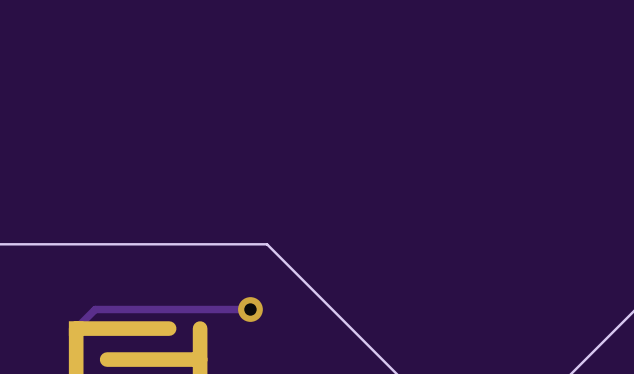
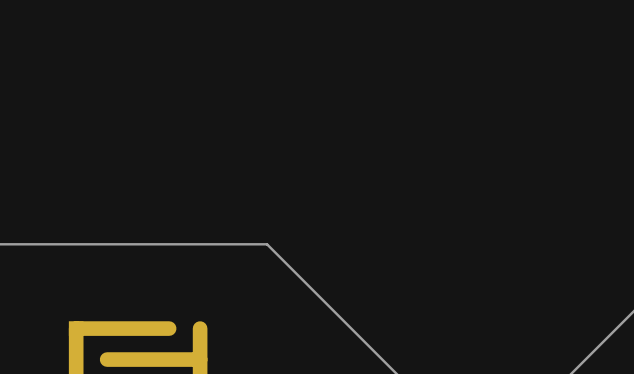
track: (250, 309) (95, 309) (76, 328) -> none
via: (250, 309) -> none

